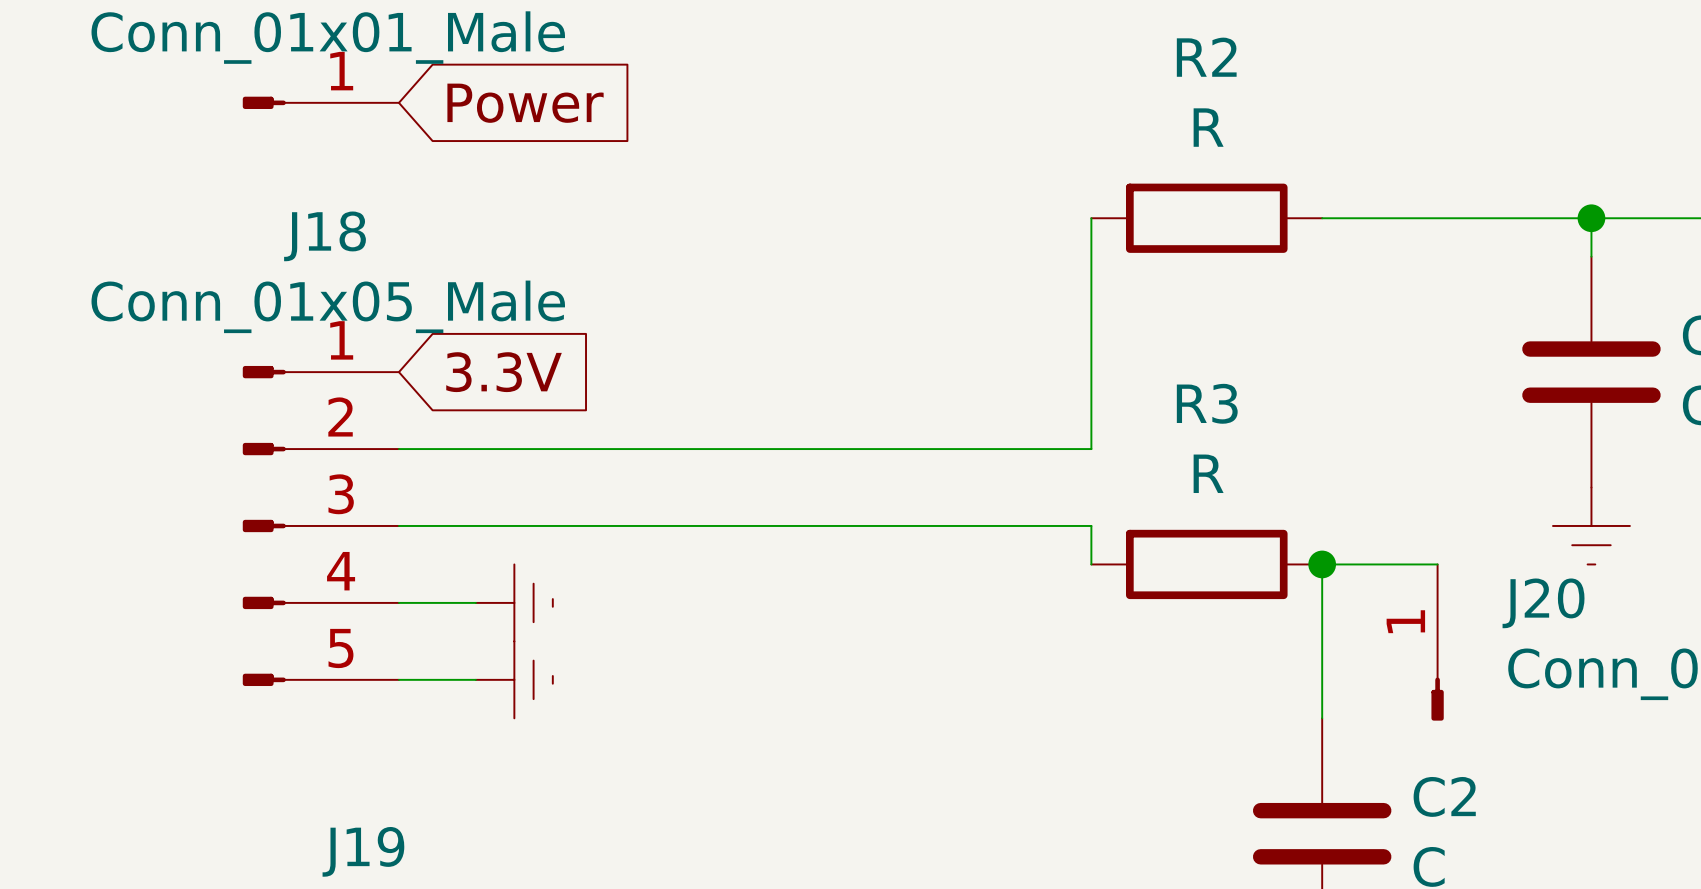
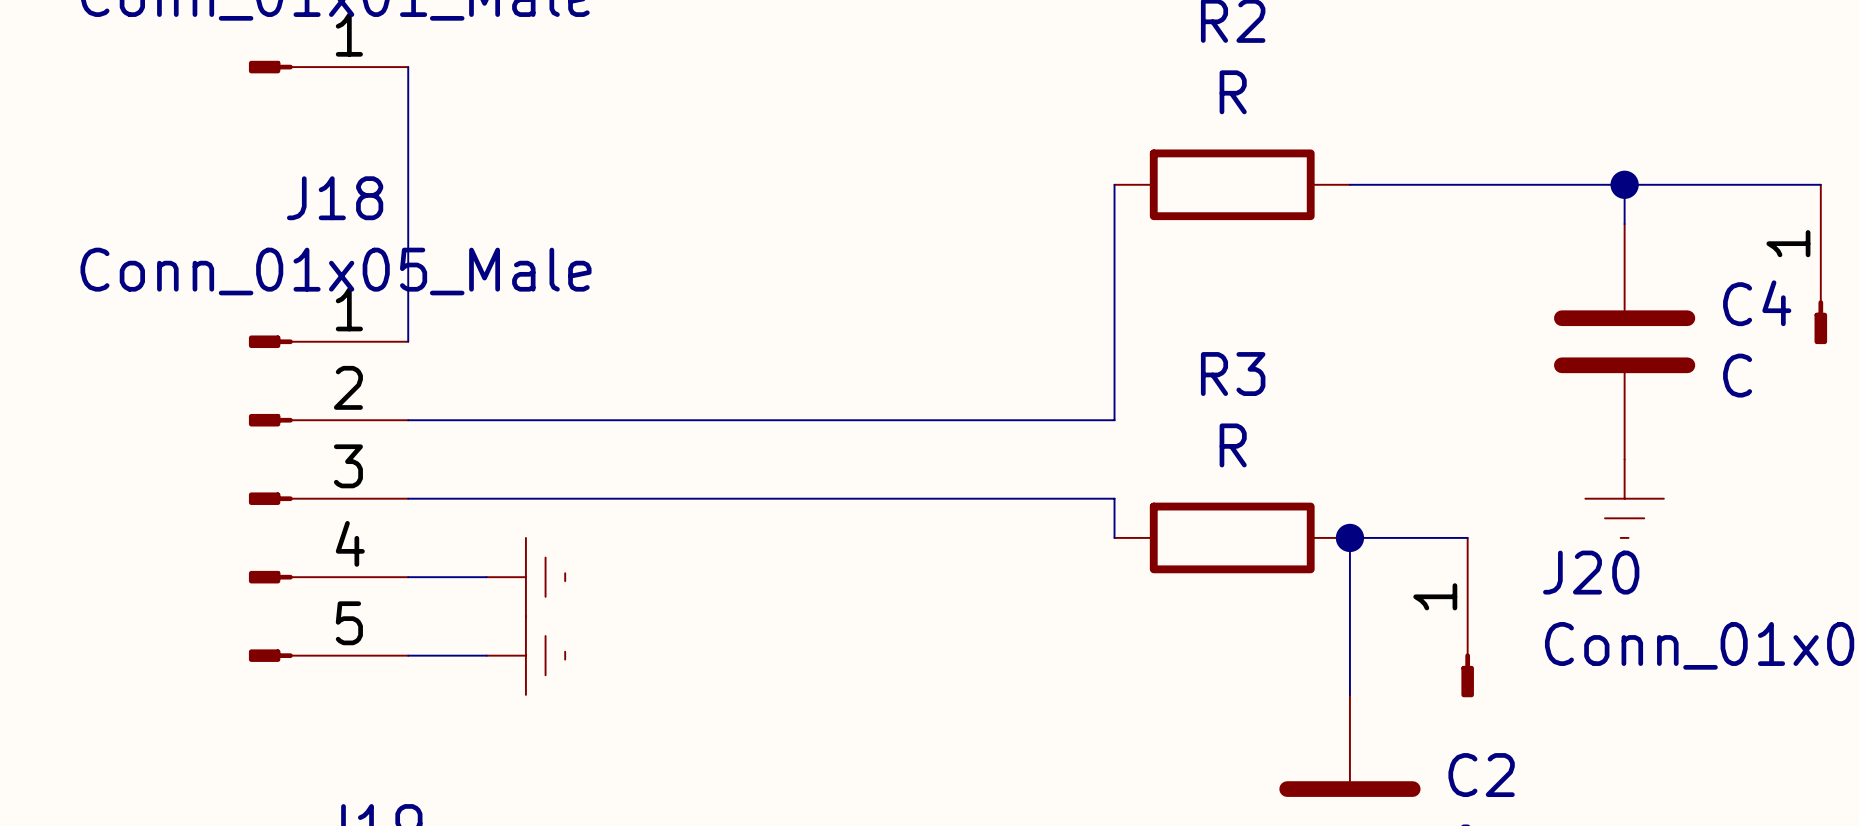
wire: none -> (408, 67) (408, 341)
global label: Power (525, 103) -> none
global label: 3.3V (504, 372) -> none

